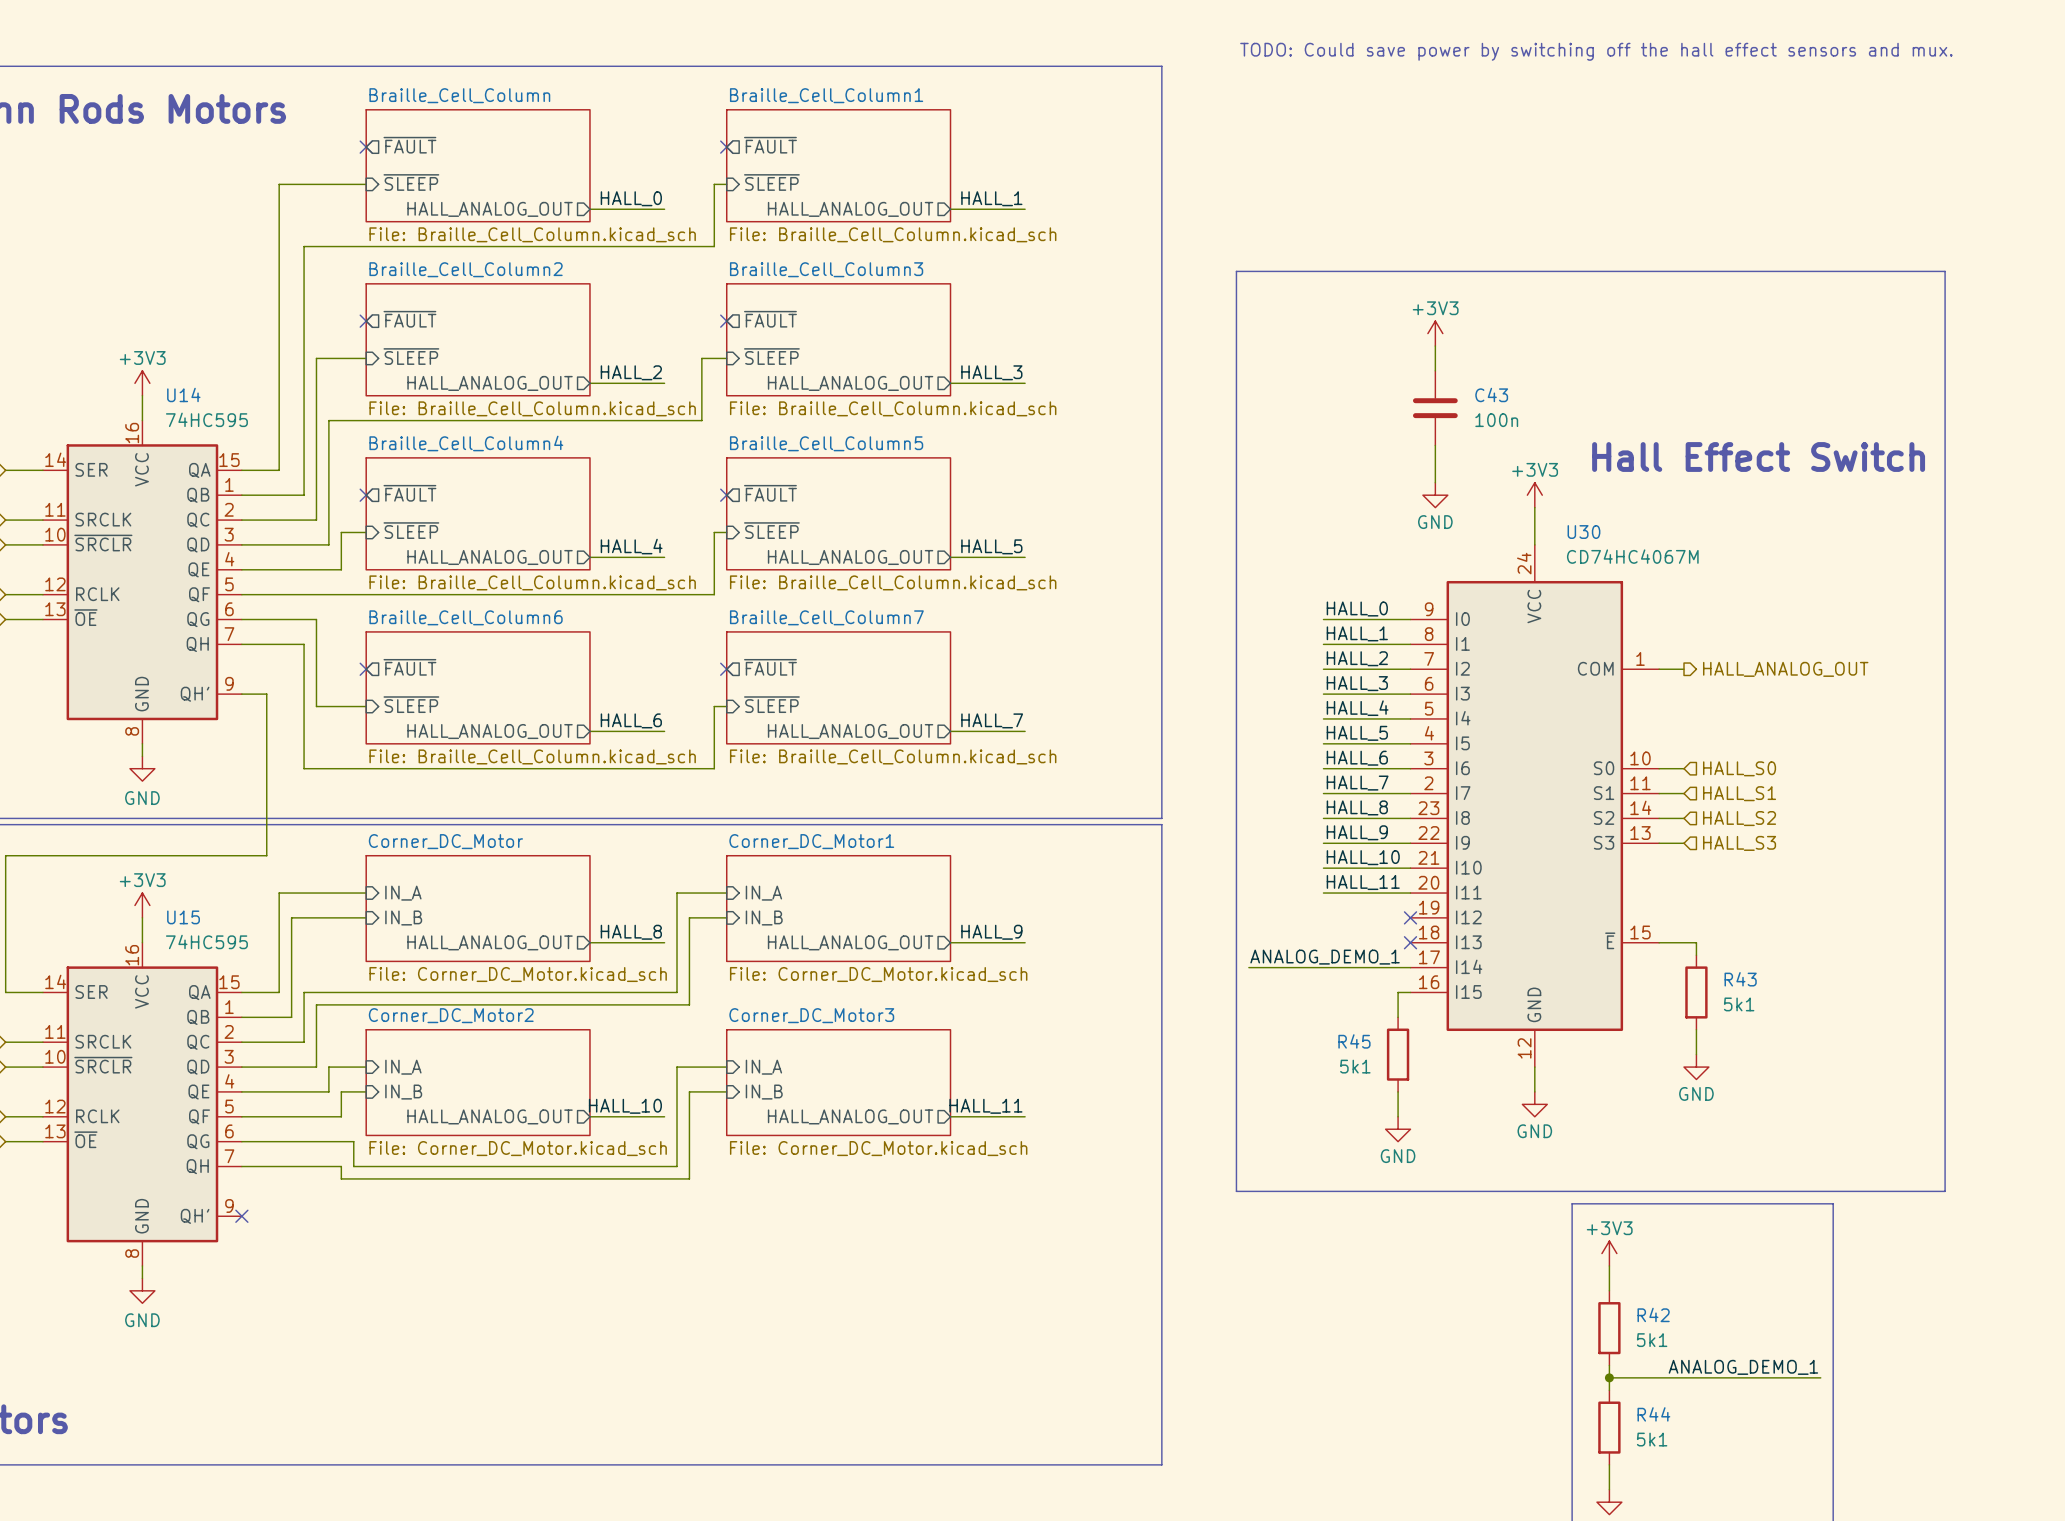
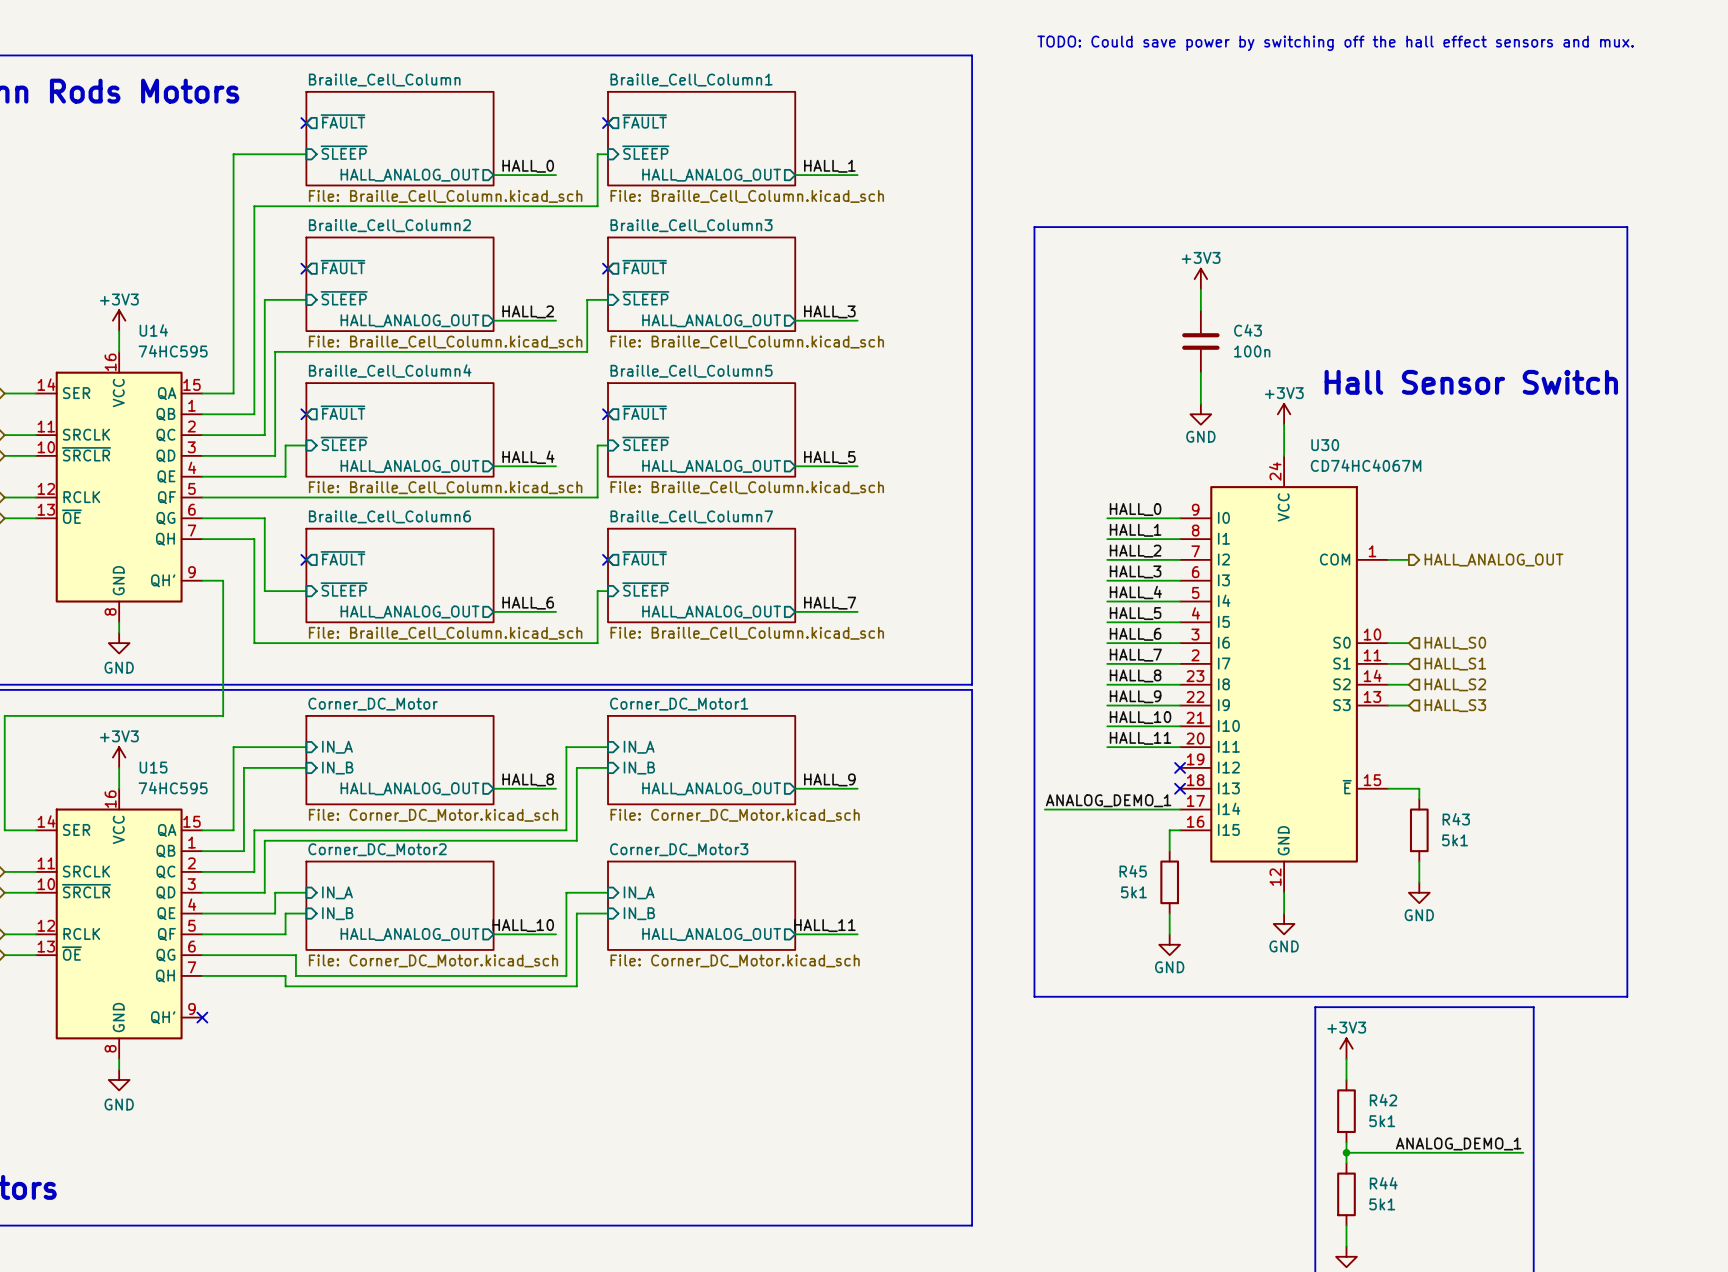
text: Hall Effect Switch (1758, 457) -> Hall Sensor Switch (1471, 382)

